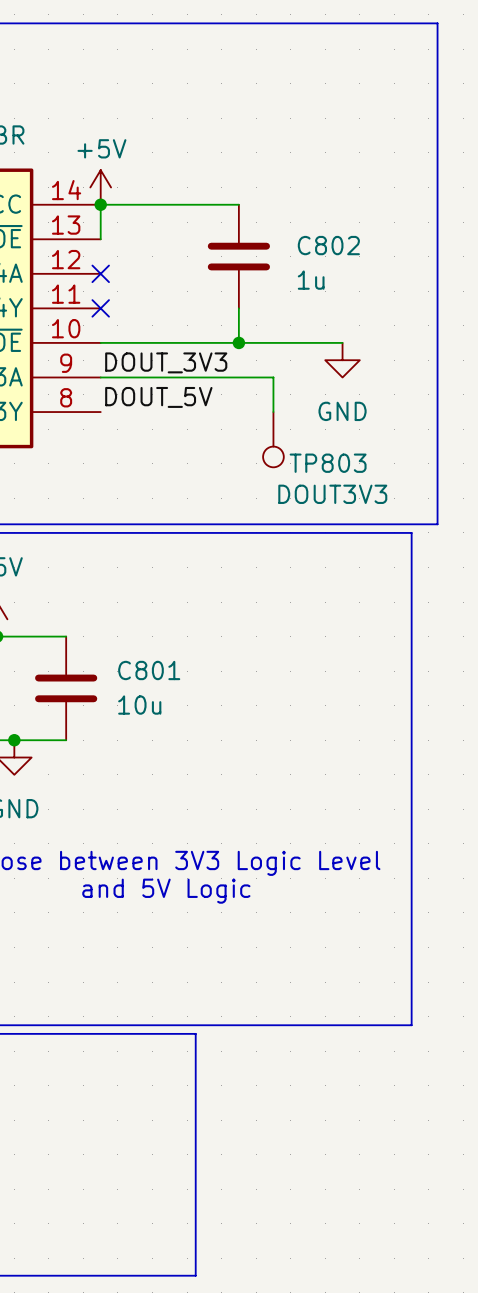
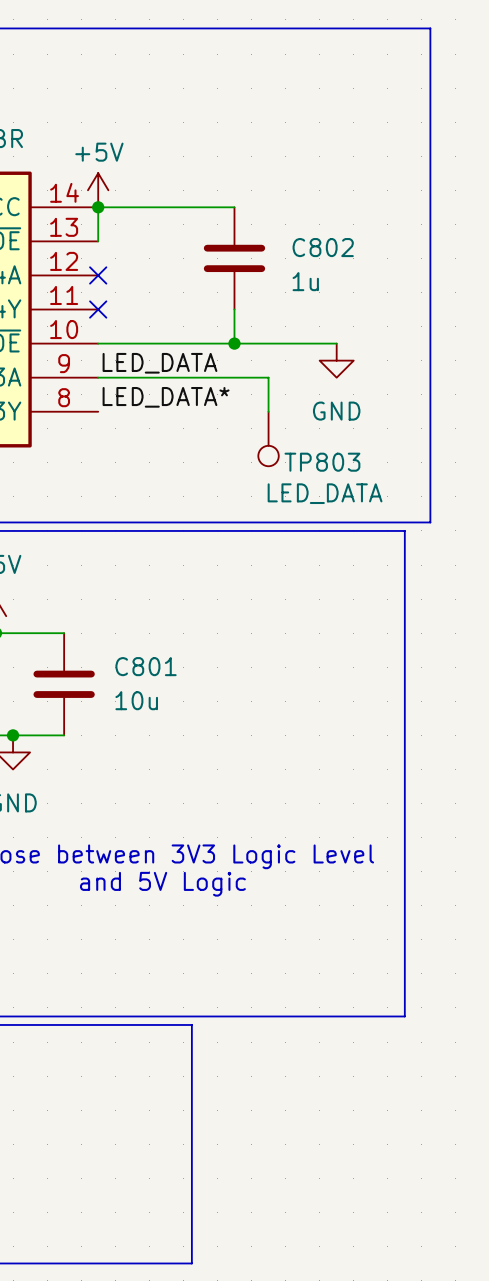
label: DOUT_3V3 (166, 362) -> LED_DATA (159, 363)
label: DOUT_5V (158, 397) -> LED_DATA* (166, 397)
TP803 value: DOUT3V3 (332, 494) -> LED_DATA (325, 493)

